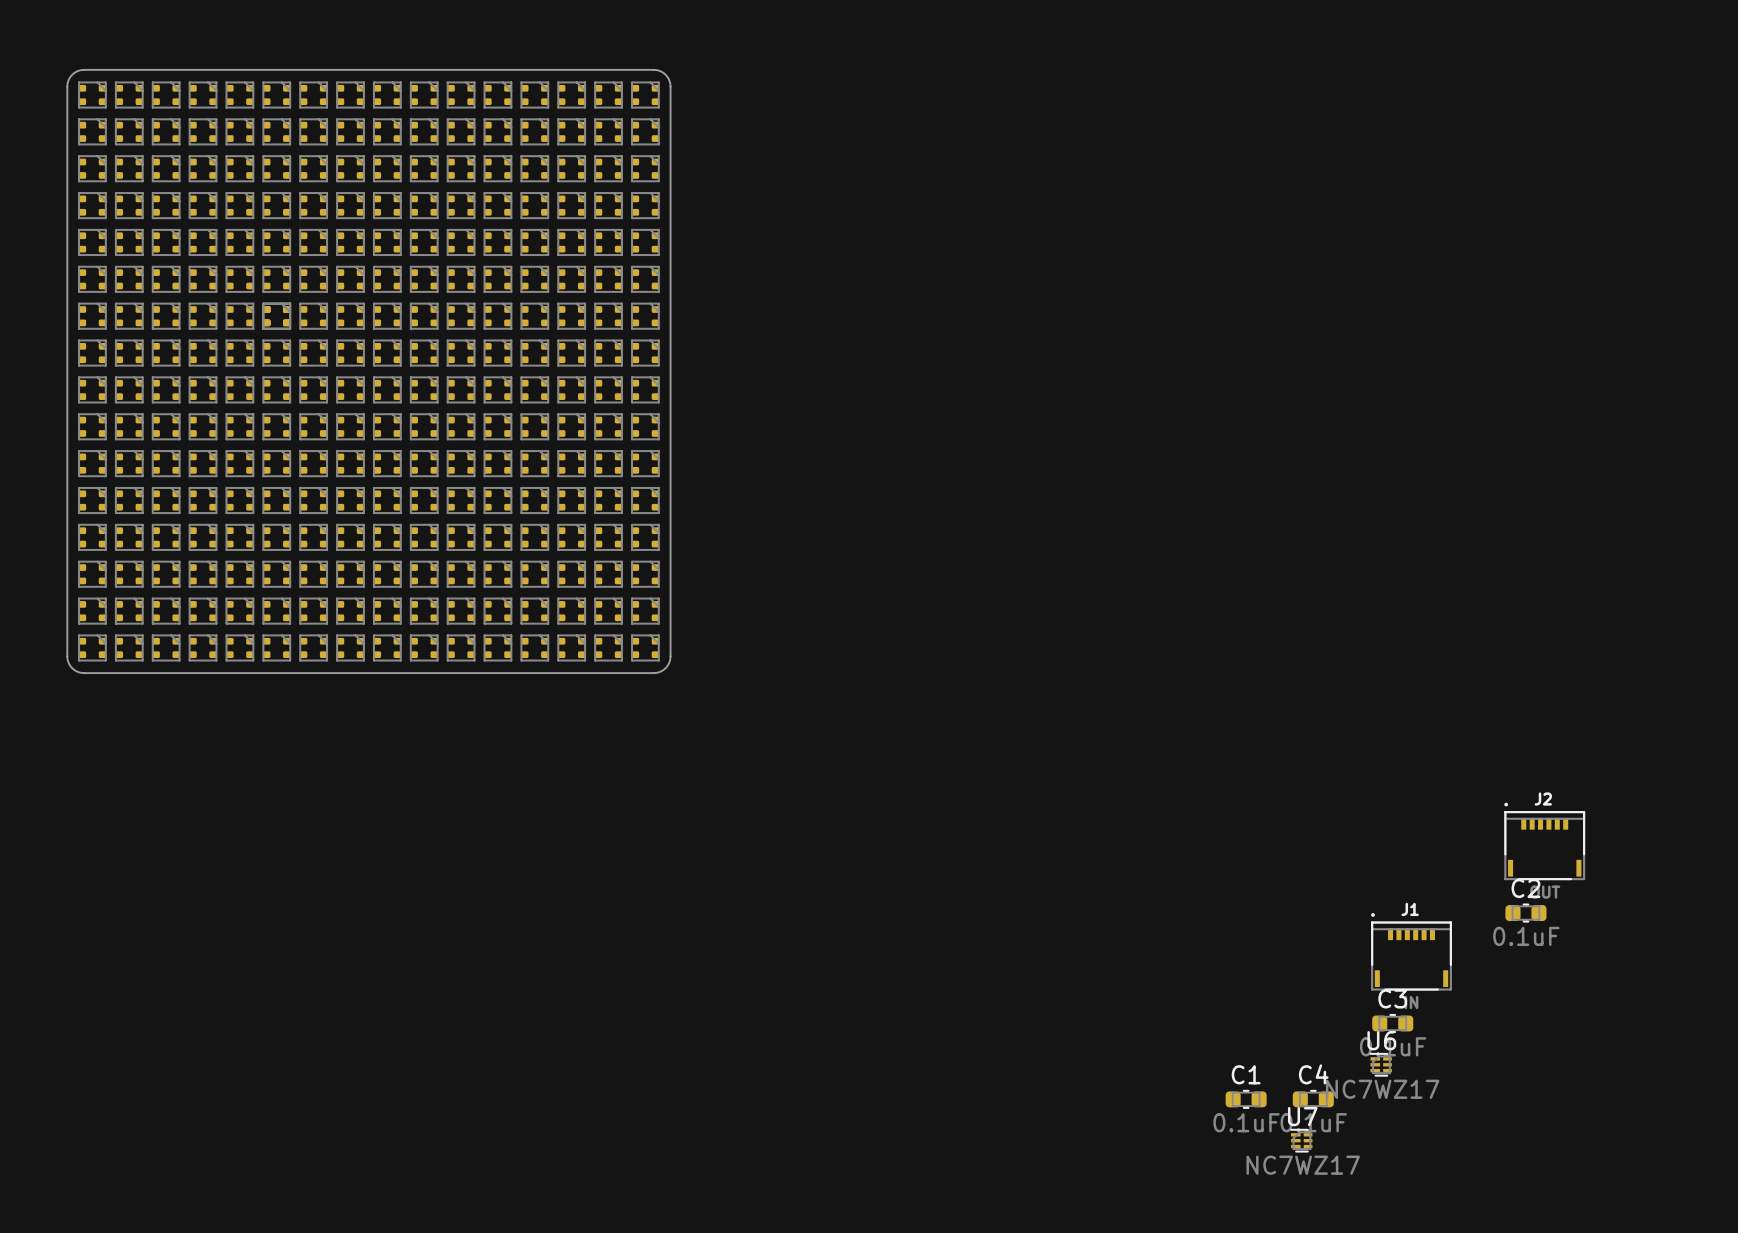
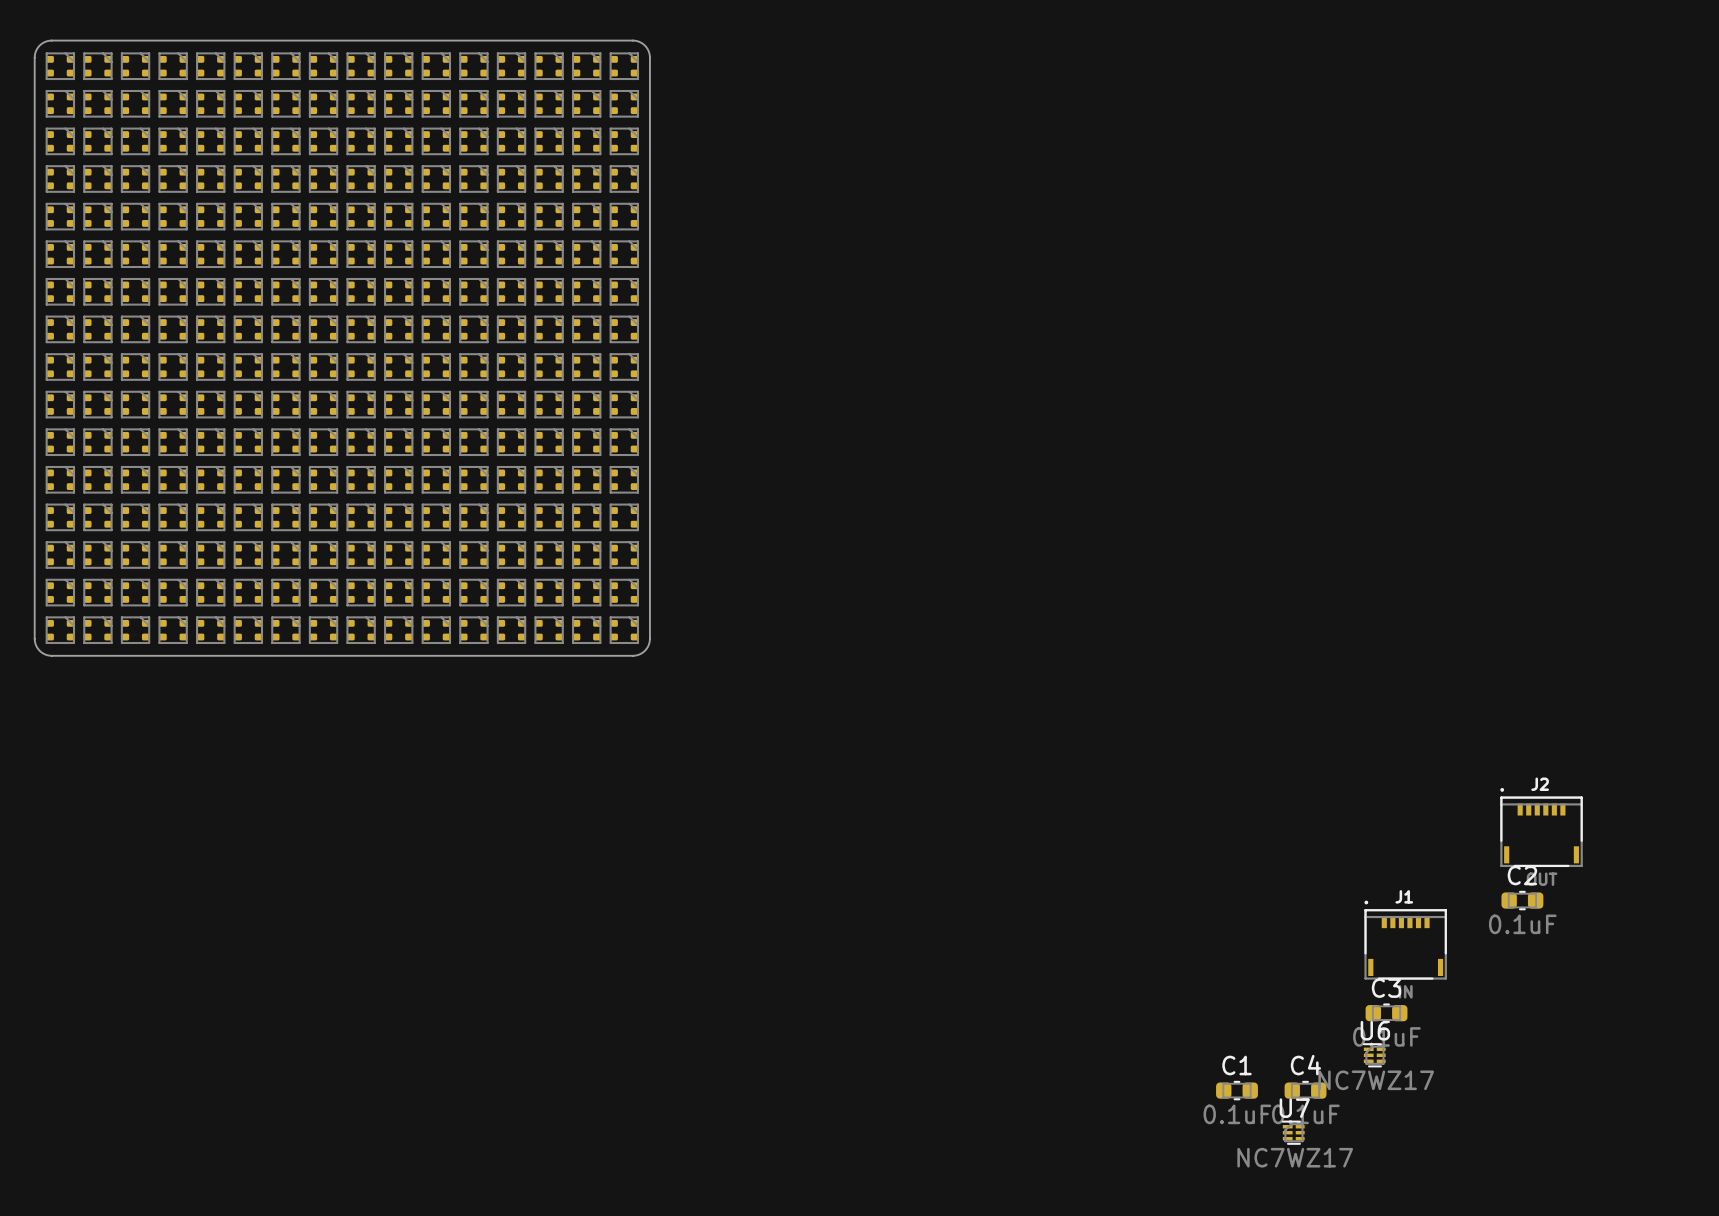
part: (276, 316) -> none

